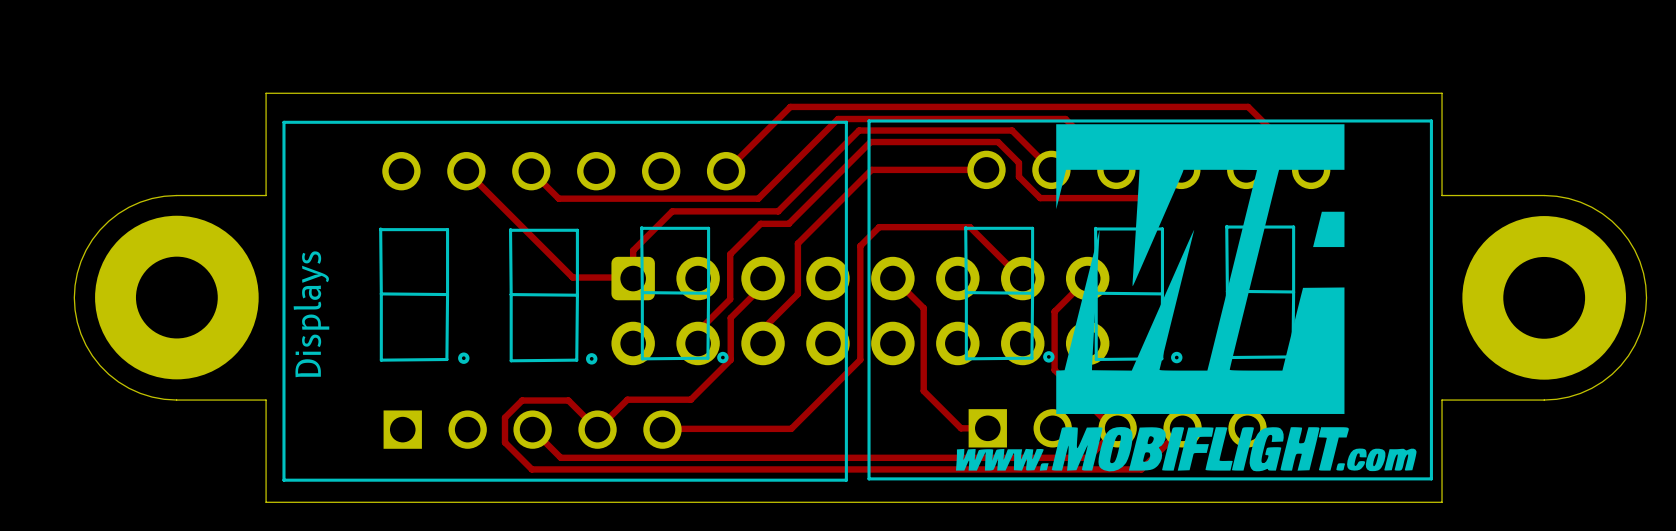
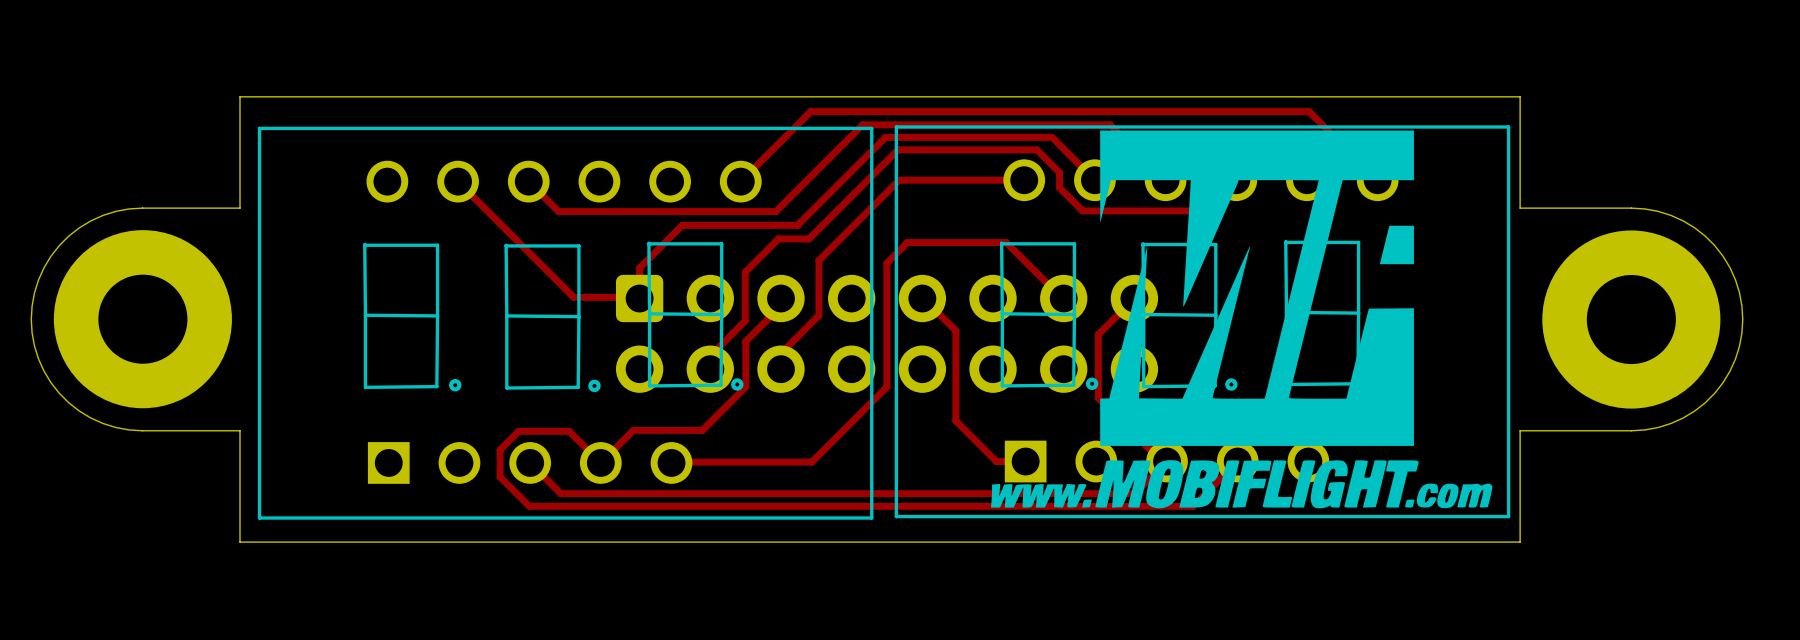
text: Displays (311, 314) -> none

